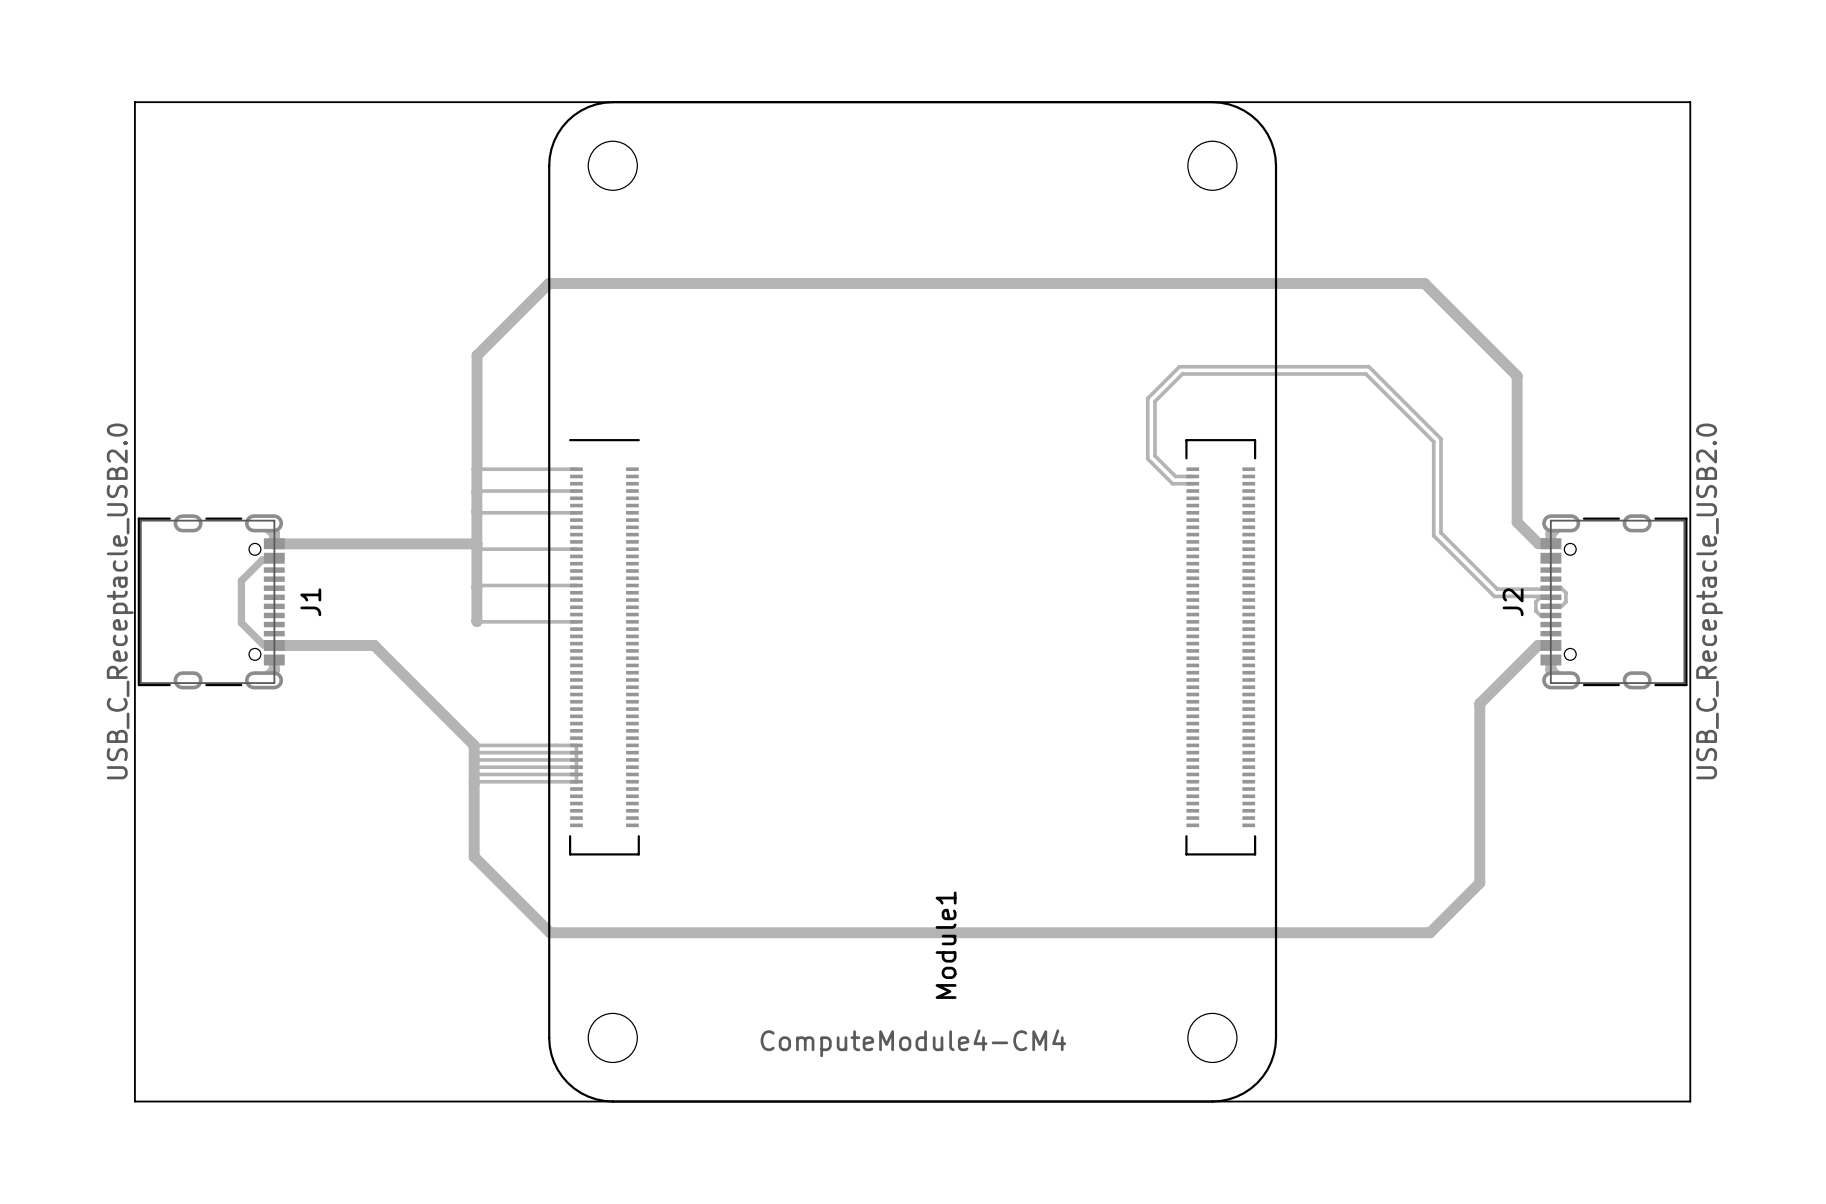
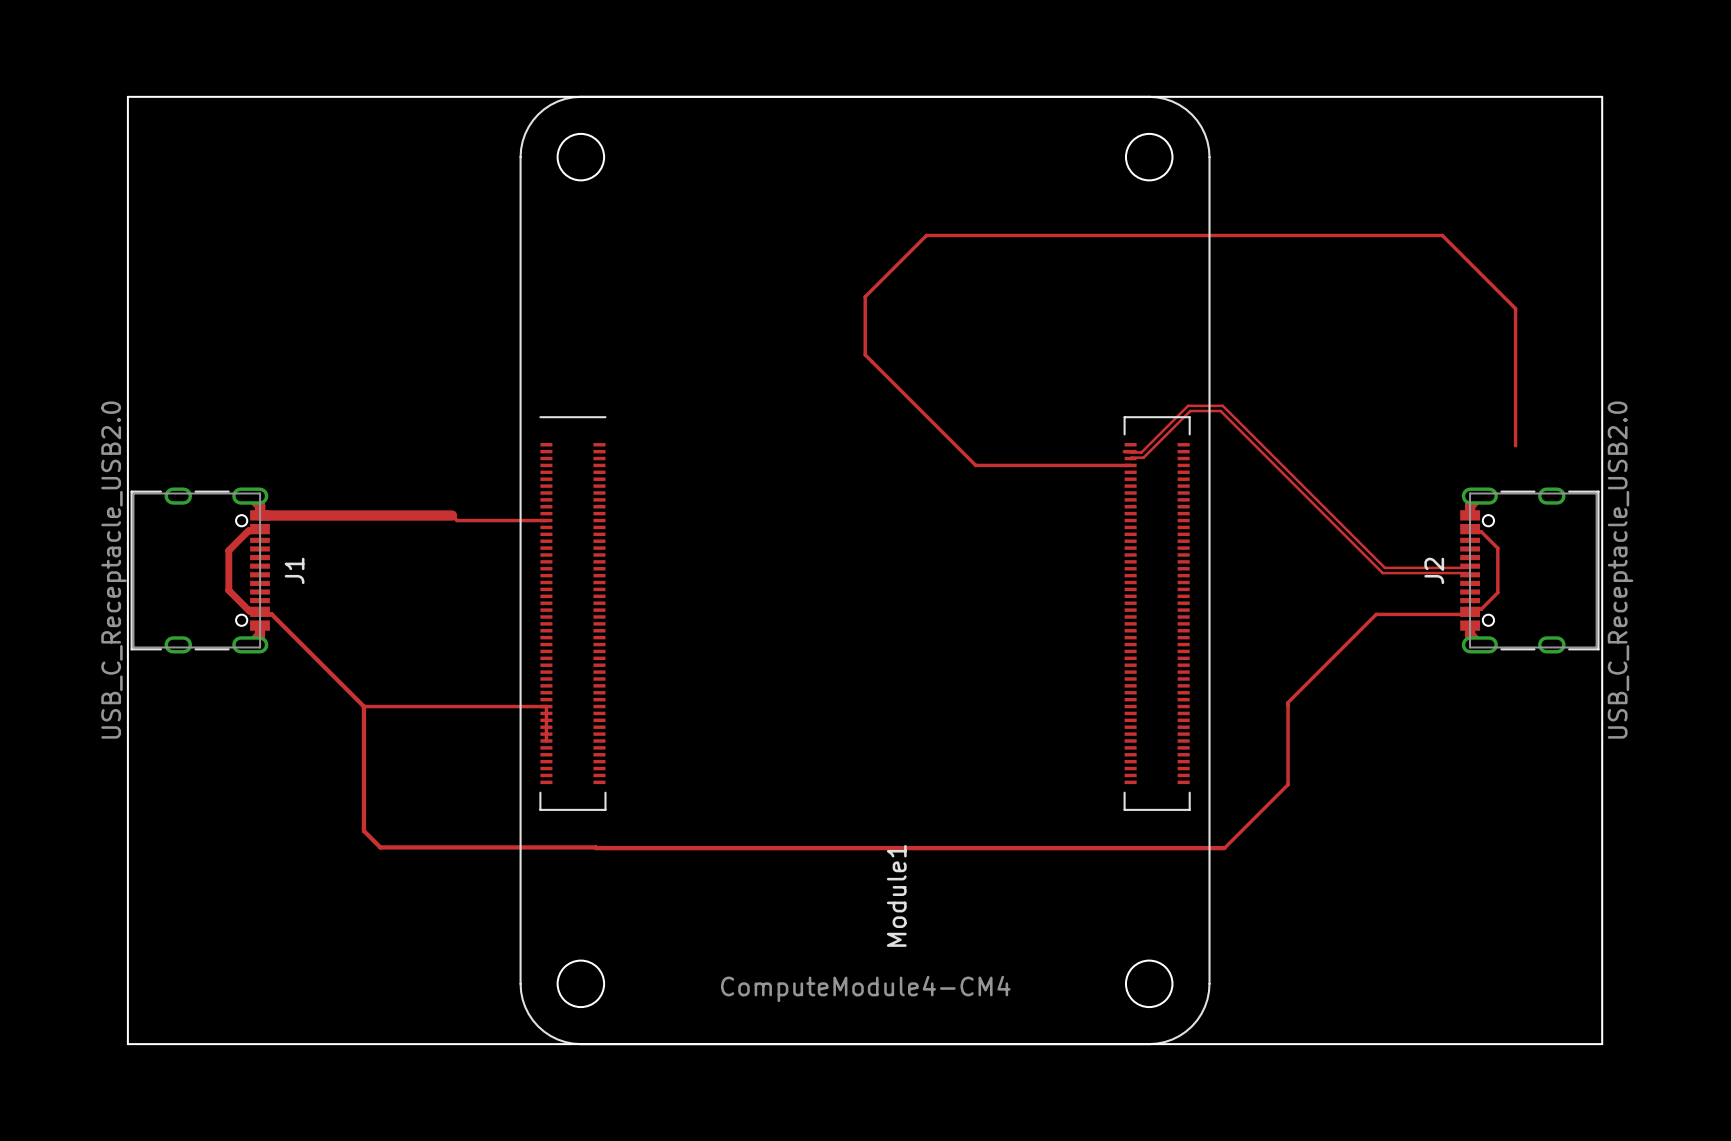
track: (476, 469) (476, 621) -> none
track: (576, 469) (477, 469) (477, 355) (549, 283) (1424, 283) (1517, 375) (1517, 522) (1538, 543) (1550, 543) -> none
track: none -> (1515, 445) (1515, 308) (1442, 235) (926, 235) (865, 296) (865, 354) (975, 465) (1130, 465)
track: (1186, 476) (1175, 476) (1155, 455) (1155, 401) (1182, 374) (1365, 374) (1433, 441) (1433, 535) (1494, 596) (1550, 596) (1540, 597) (1535, 601) (1535, 611) (1540, 615) (1550, 615) -> none
track: none -> (1130, 451) (1141, 452) (1188, 405) (1222, 405) (1384, 567) (1468, 567)
track: (1192, 483) (1172, 483) (1147, 458) (1147, 398) (1179, 366) (1368, 366) (1440, 438) (1440, 532) (1497, 589) (1561, 588) (1565, 592) (1565, 601) (1561, 606) (1550, 605) -> (1130, 458) (1143, 457) (1190, 411) (1220, 411) (1382, 573) (1468, 573)
track: (576, 491) (476, 492) -> none
track: (476, 511) (576, 512) -> none
track: none -> (1470, 531) (1481, 531) (1497, 548) (1497, 592) (1481, 609) (1470, 609)
track: (576, 585) (478, 585) (476, 587) -> none
track: (480, 621) (576, 621) -> none
track: (276, 645) (374, 645) (474, 745) (474, 856) (550, 932) (1430, 932) (1479, 883) (1479, 703) (1538, 645) (1551, 645) -> none
track: none -> (260, 614) (271, 614) (363, 706)
track: none -> (1470, 614) (1376, 614) (1288, 702) (1288, 784) (1224, 848) (380, 847) (363, 830) (363, 706)
track: none -> (363, 706) (449, 706)
track: (474, 750) (476, 752) (576, 752) -> none
track: (474, 759) (576, 759) -> none
track: (576, 767) (474, 767) -> none
track: (576, 774) (476, 774) (474, 776) -> none
track: (576, 781) (474, 783) -> none

